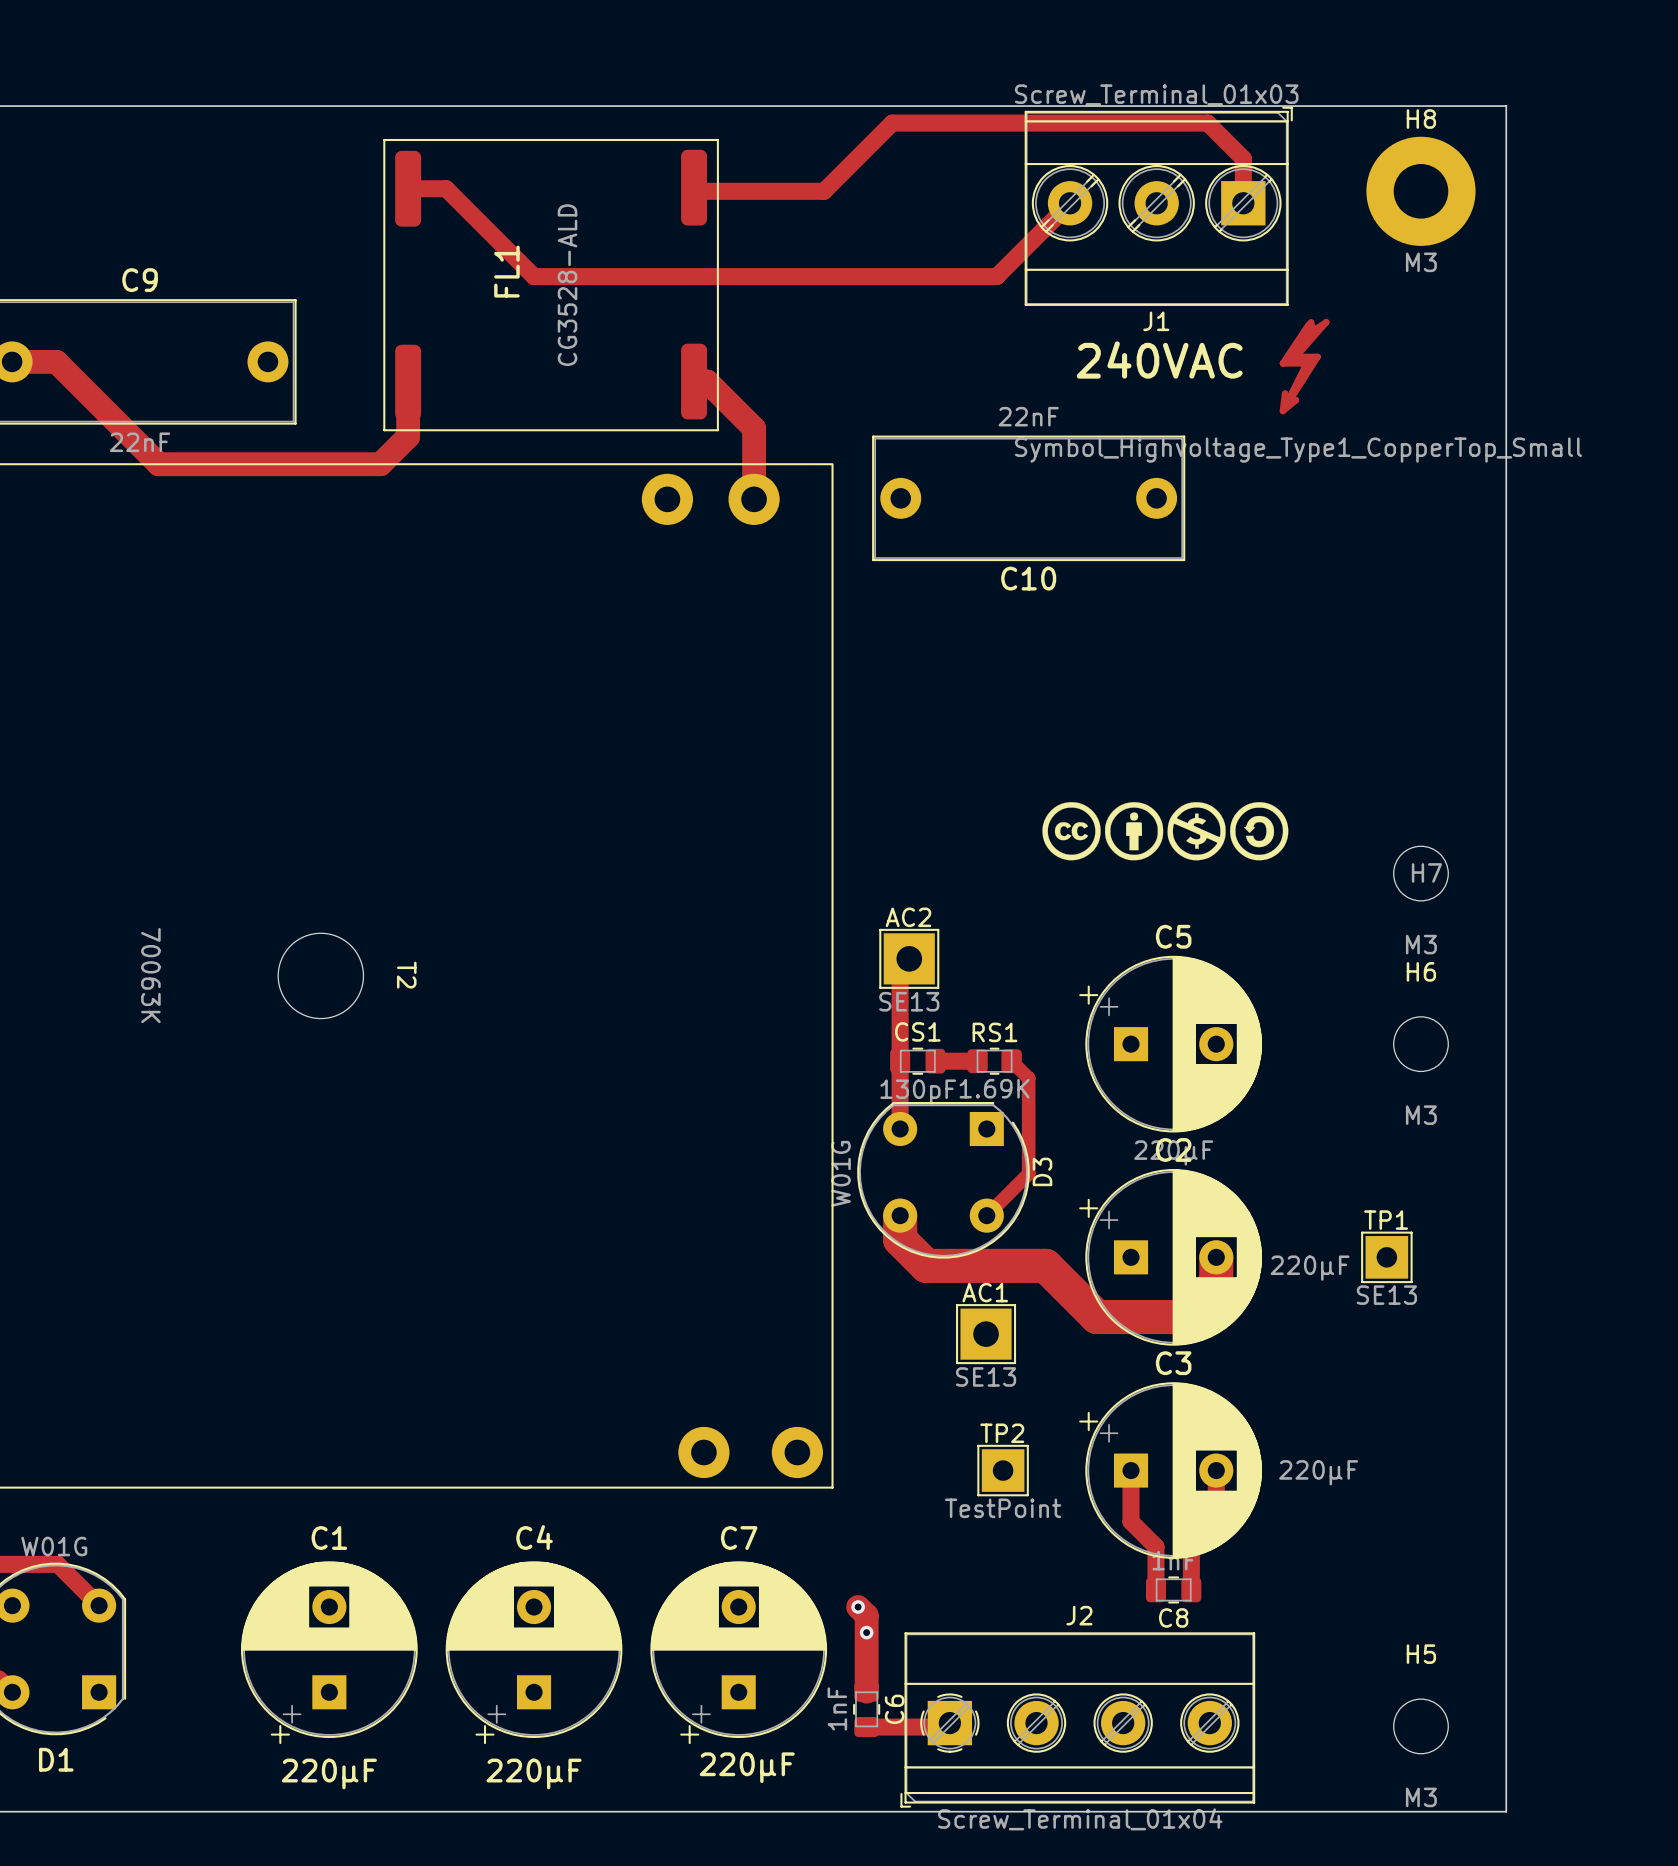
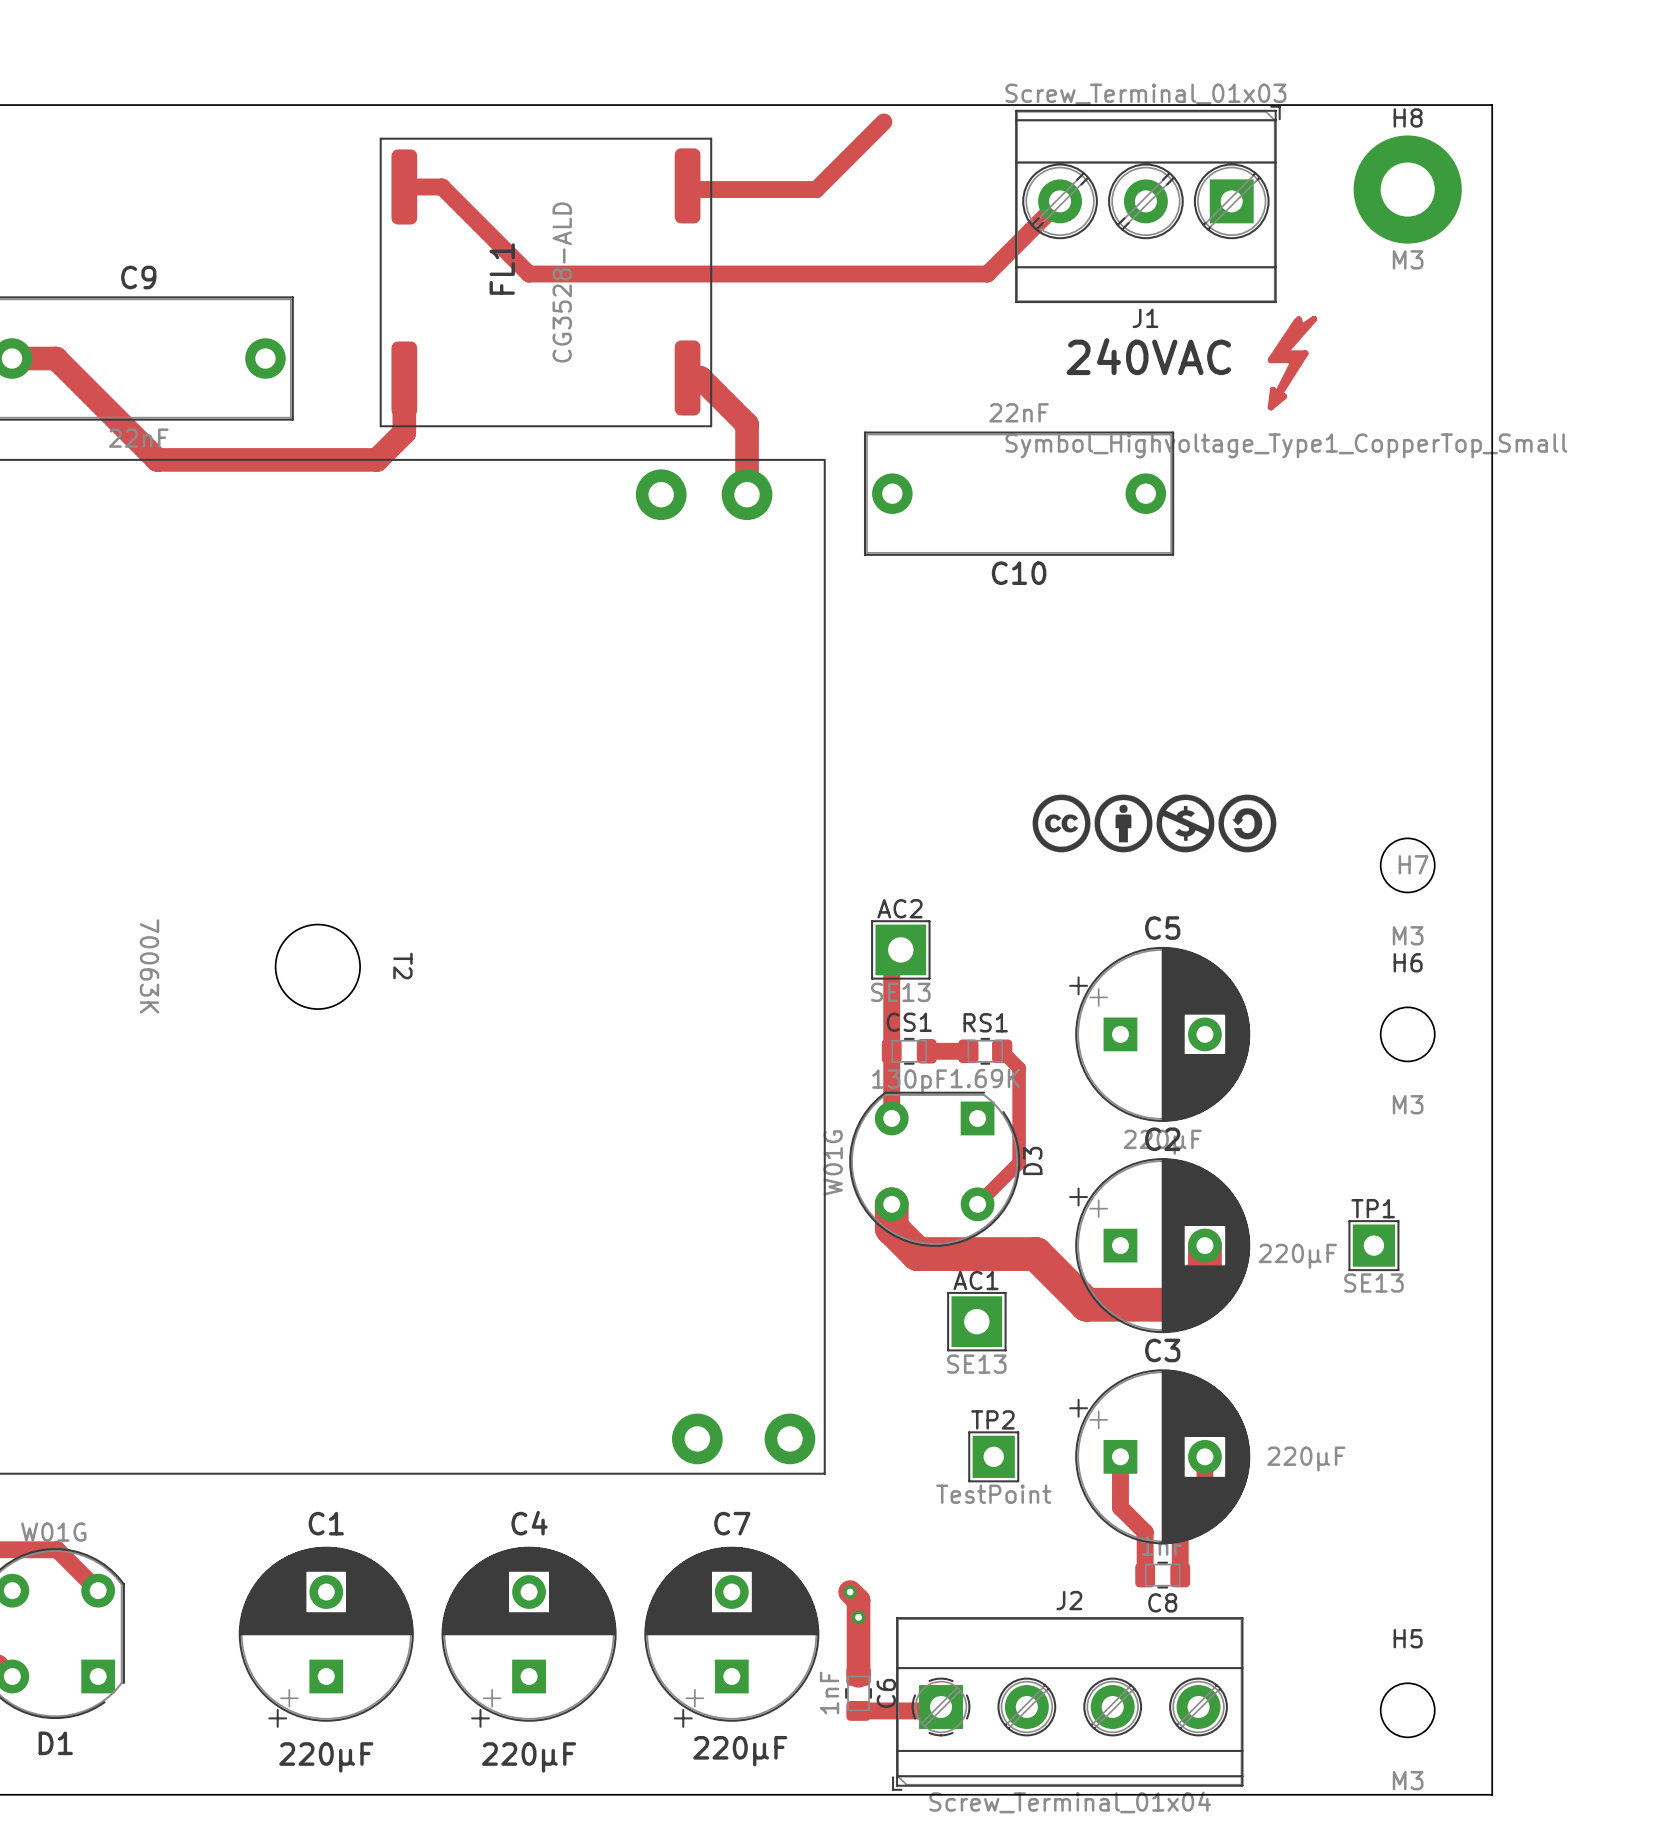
track: (892, 123) (1207, 123) (1243, 158) (1243, 203) -> none

